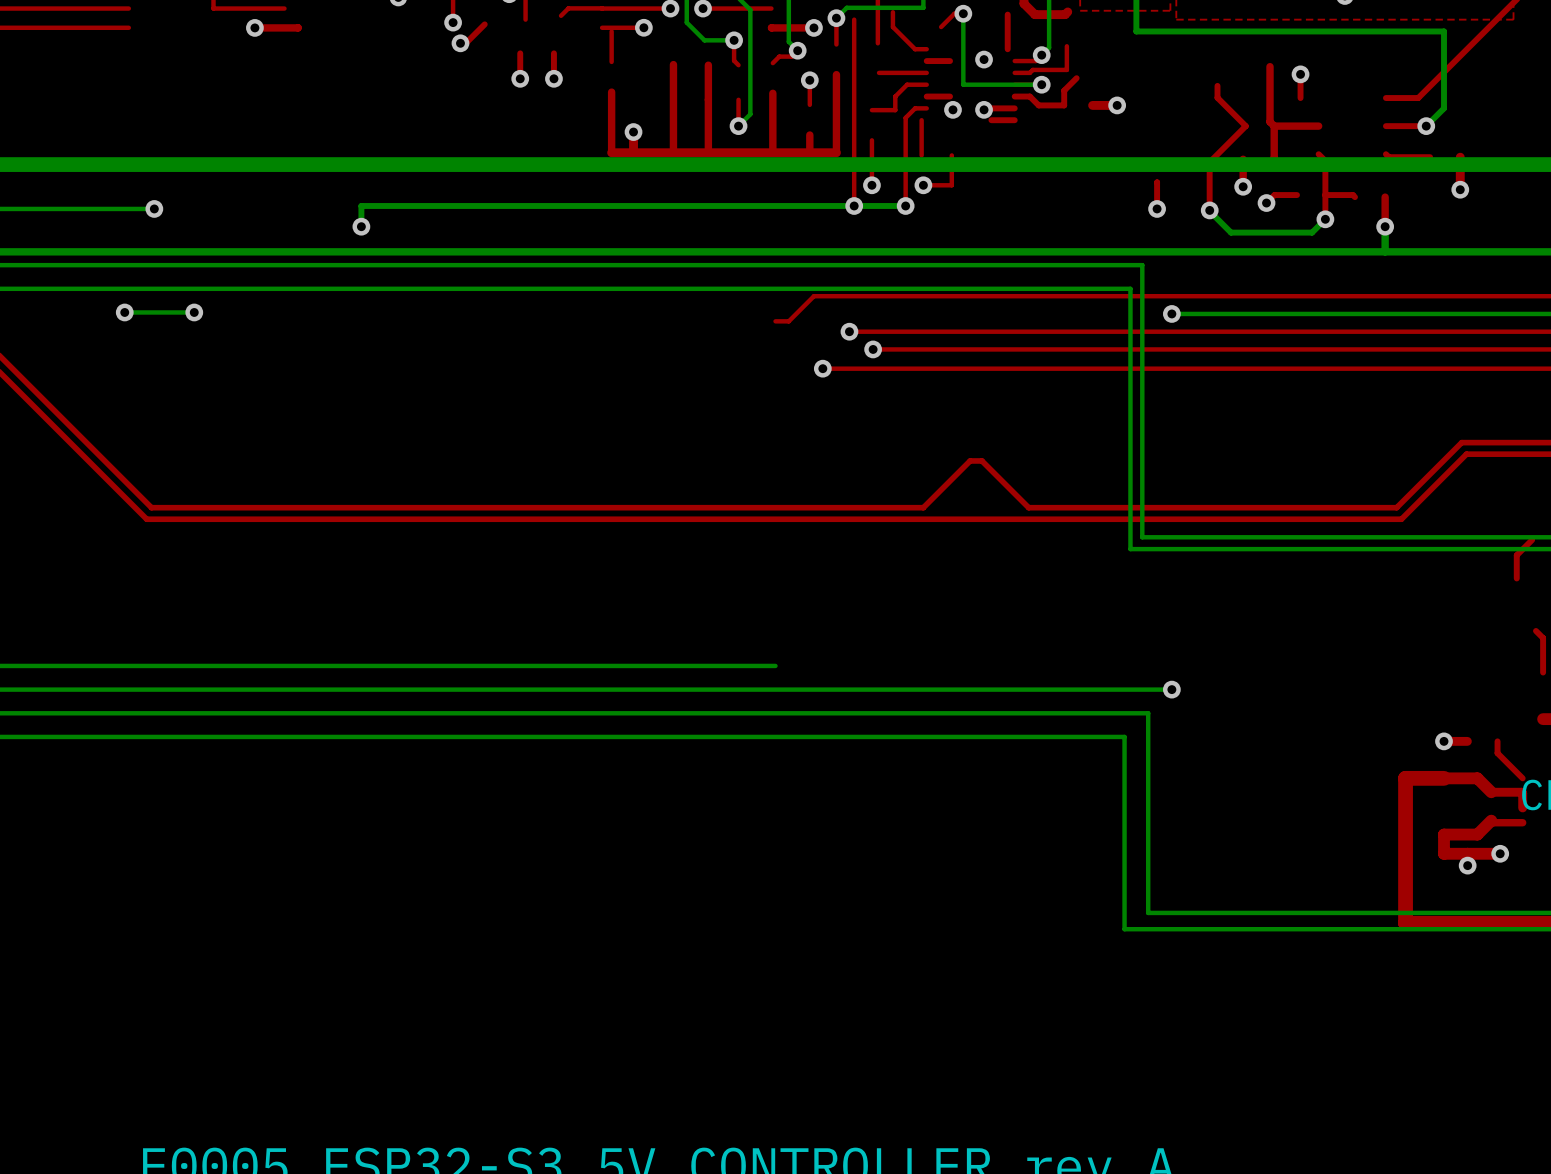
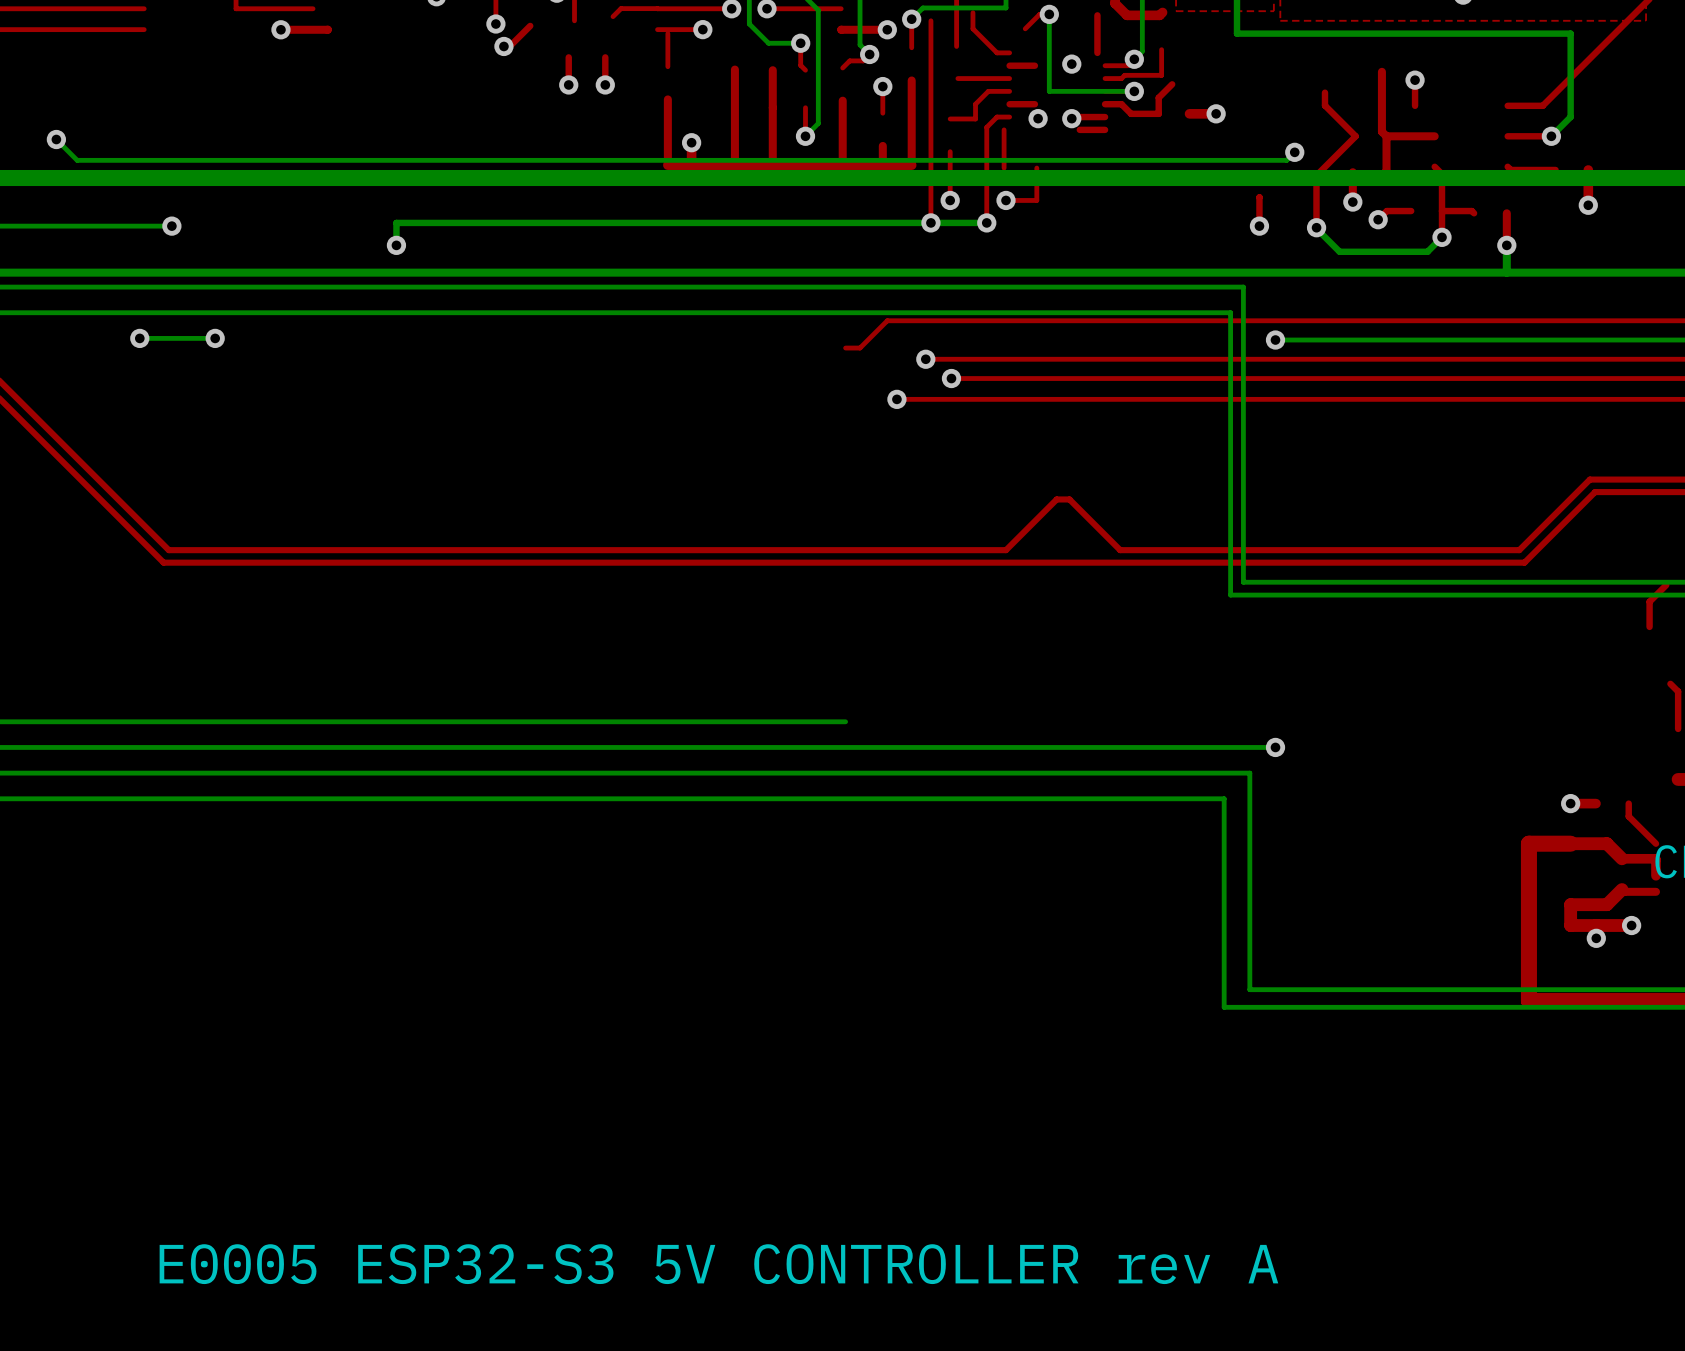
bottom track: none -> (56, 139) (77, 160) (1286, 160) (1294, 152)
via: none -> (56, 139)
via: none -> (1294, 152)

